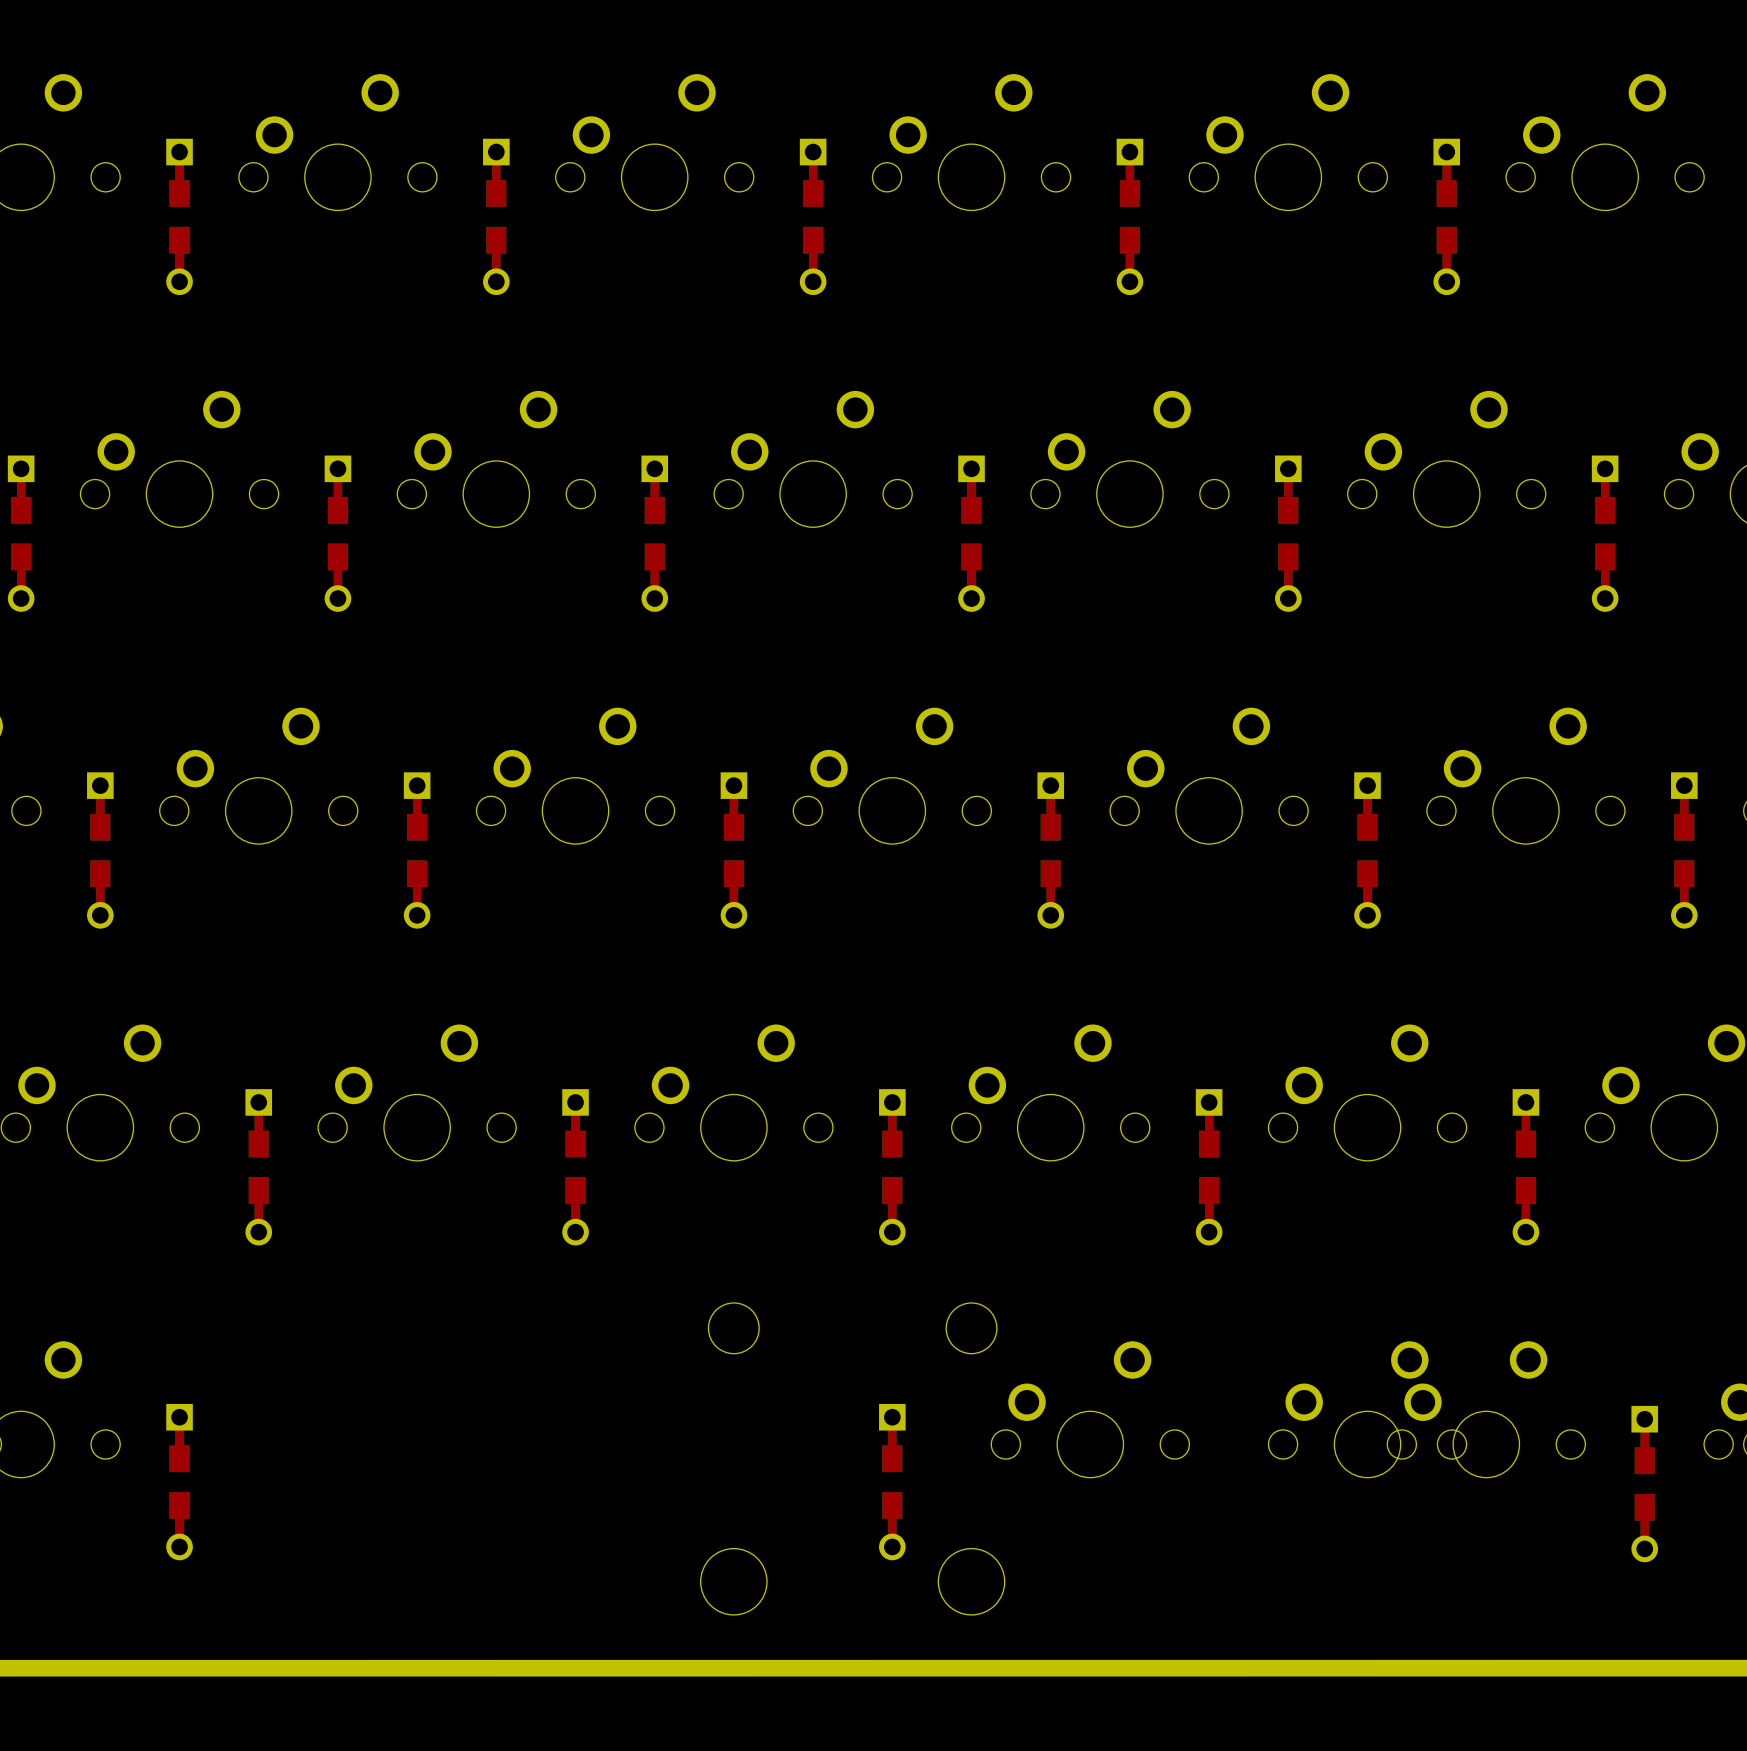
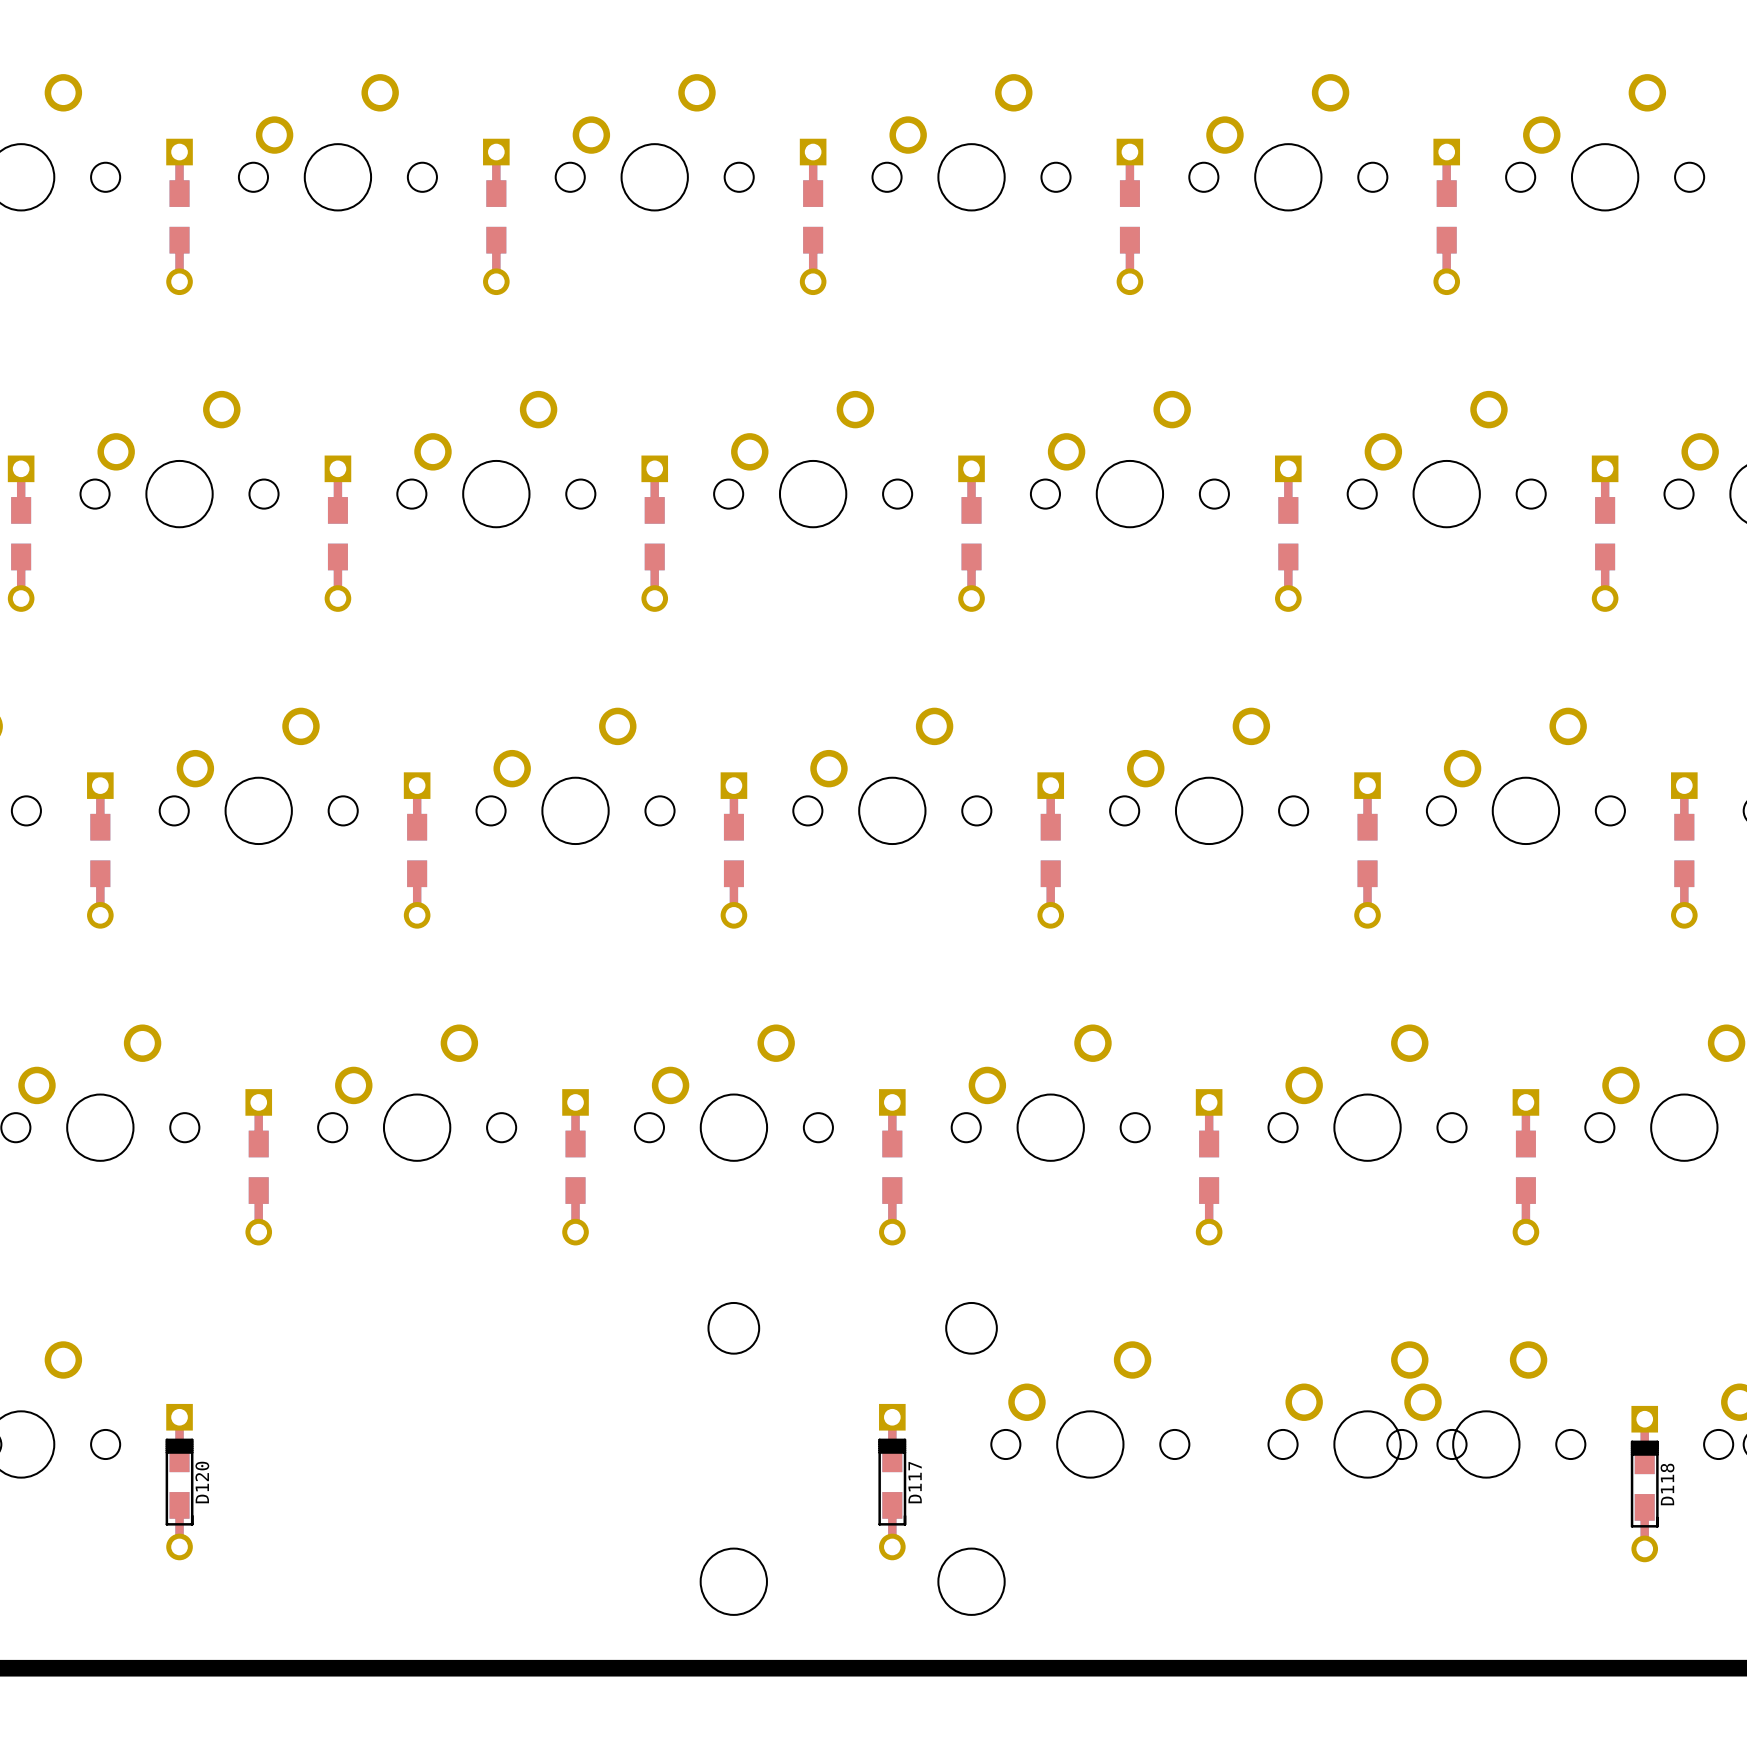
D120 side: bottom (179, 1482) -> top (179, 1482)
D117 side: bottom (892, 1482) -> top (892, 1482)
D118 side: bottom (1644, 1484) -> top (1644, 1484)

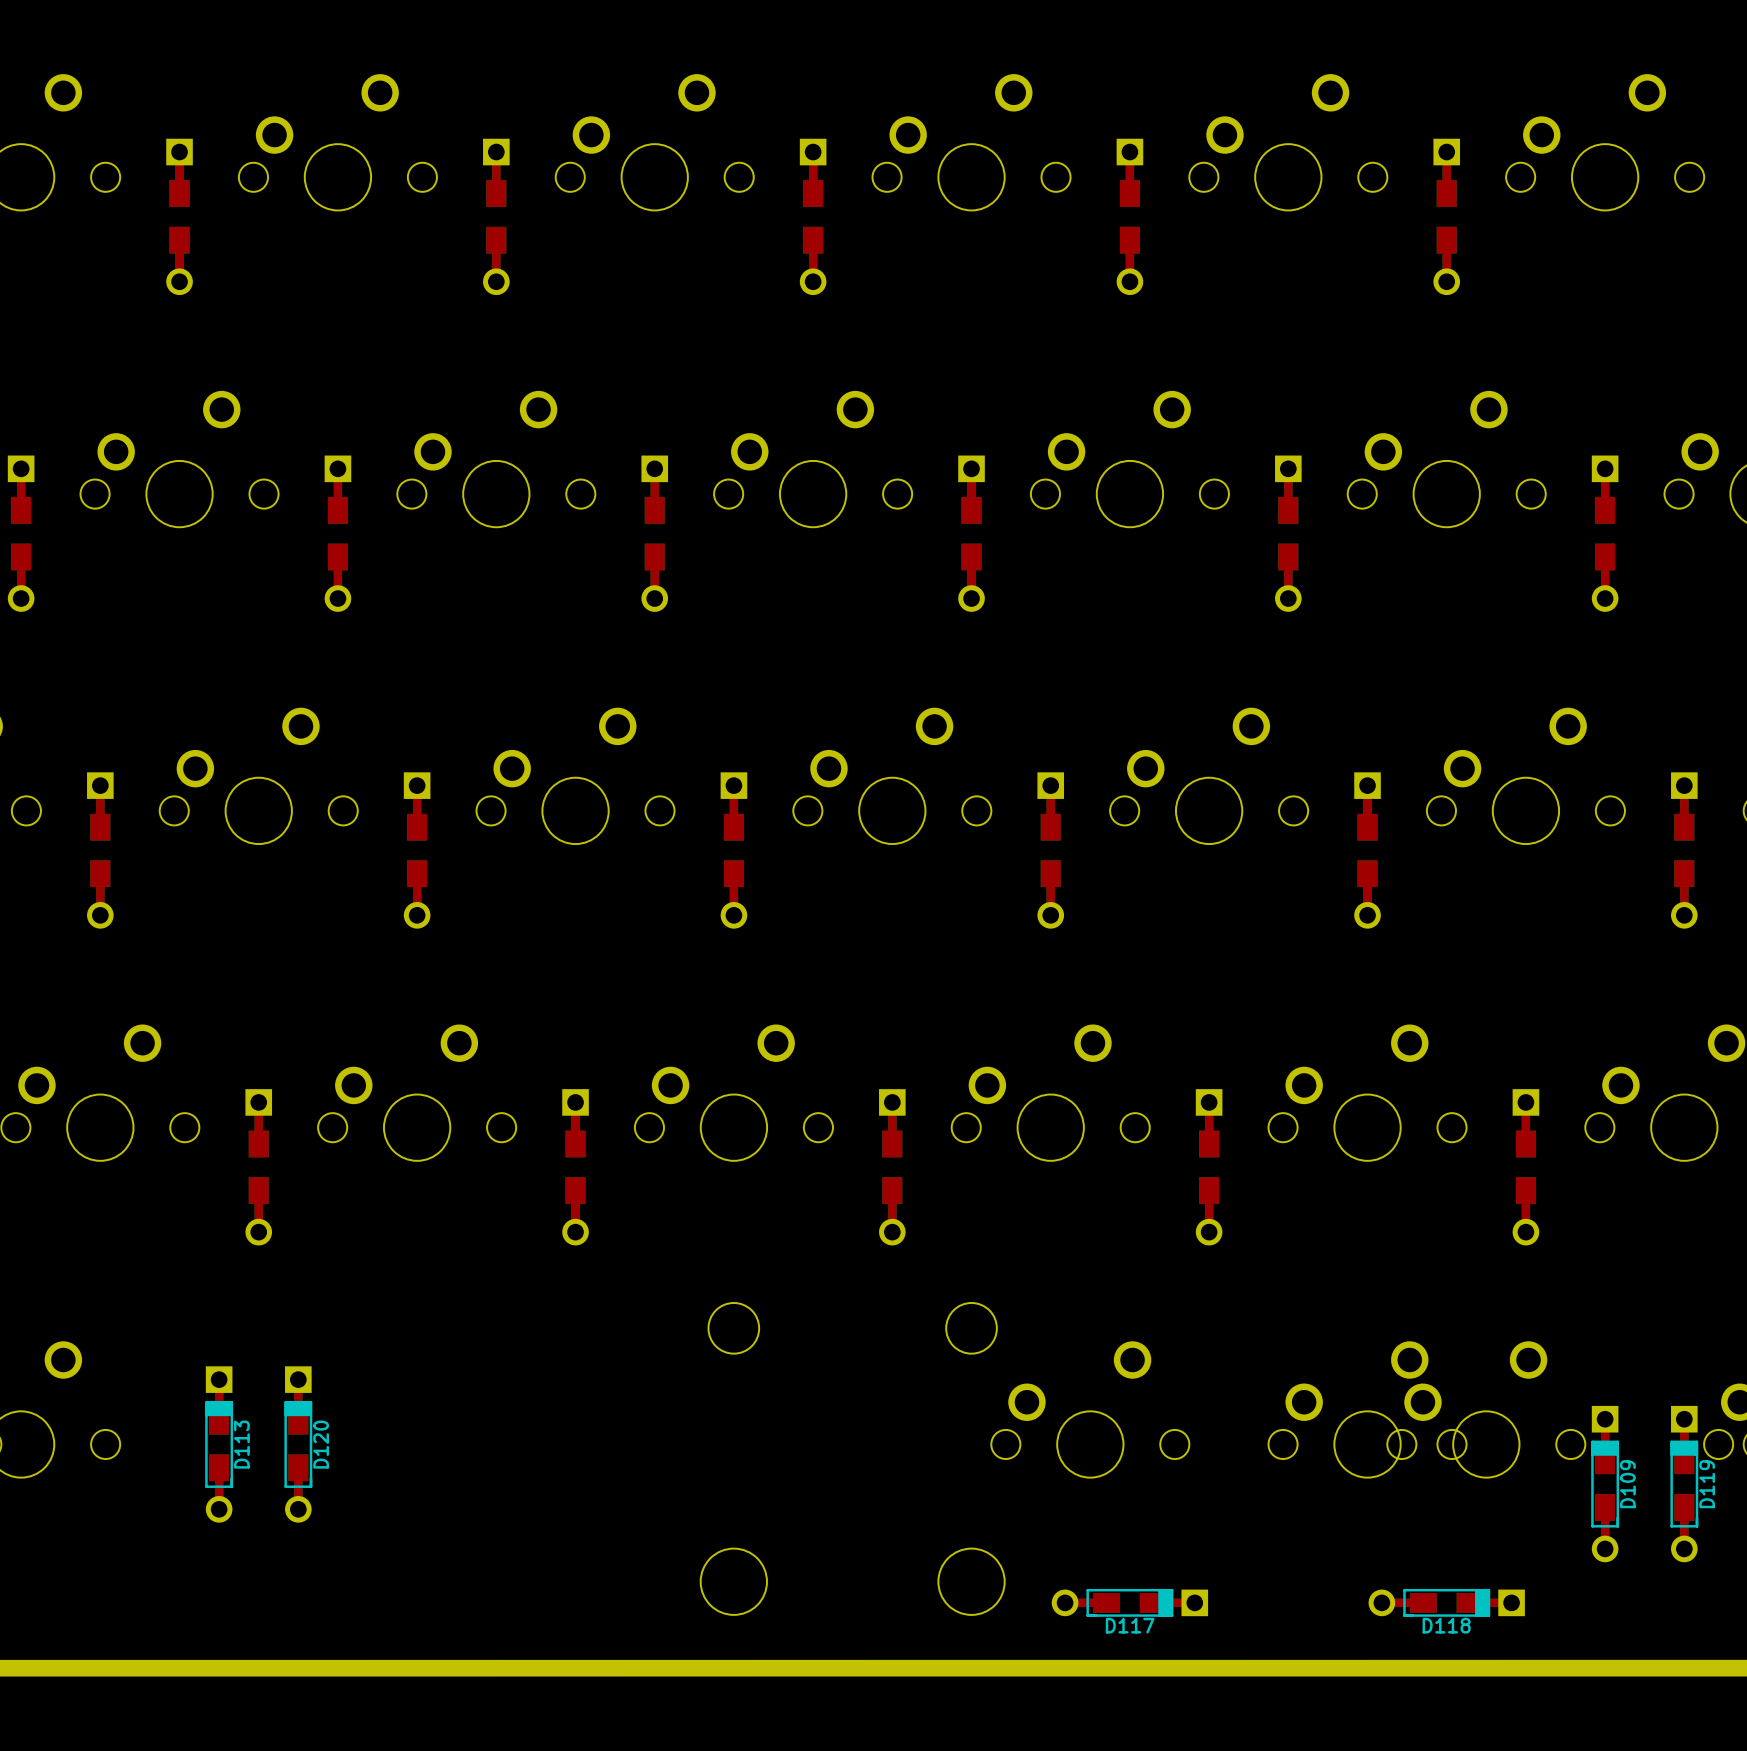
D113: none -> (219, 1444)
D120 position: (179, 1482) -> (298, 1444)
D117 rotation: 0° (892, 1482) -> 90° clockwise (1129, 1602)
D117 position: (892, 1482) -> (1129, 1602)
D109: none -> (1605, 1484)
D118 rotation: 0° (1644, 1484) -> 90° clockwise (1446, 1602)
D118 position: (1644, 1484) -> (1446, 1602)
D119: none -> (1684, 1484)

